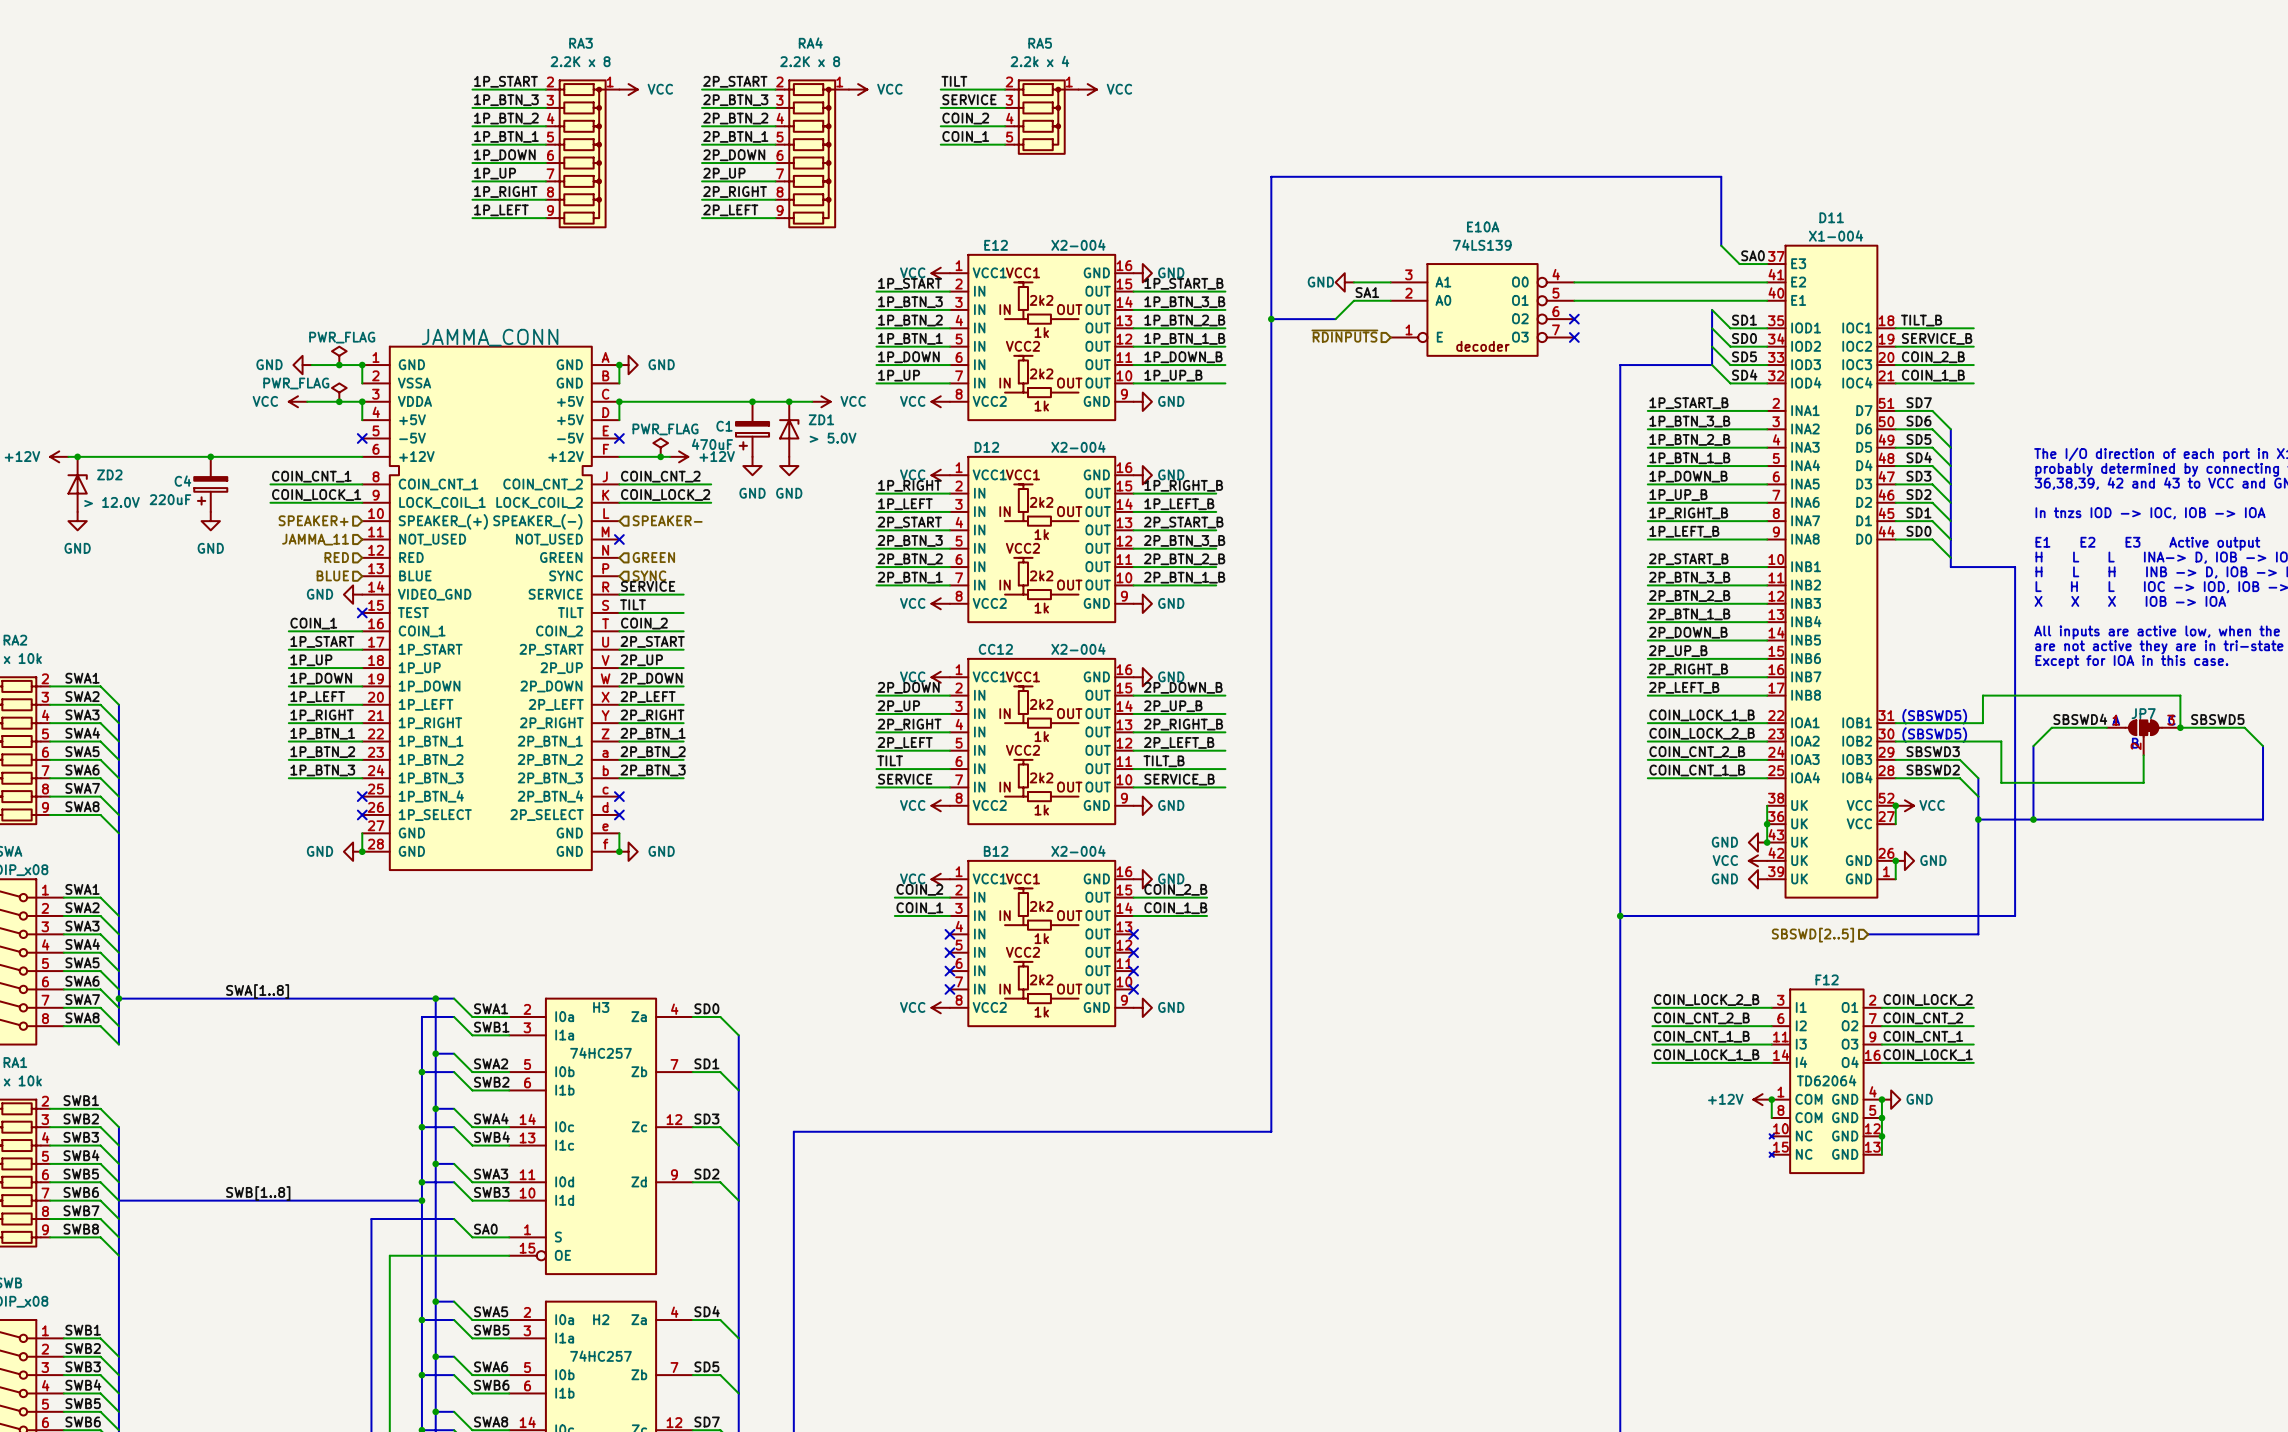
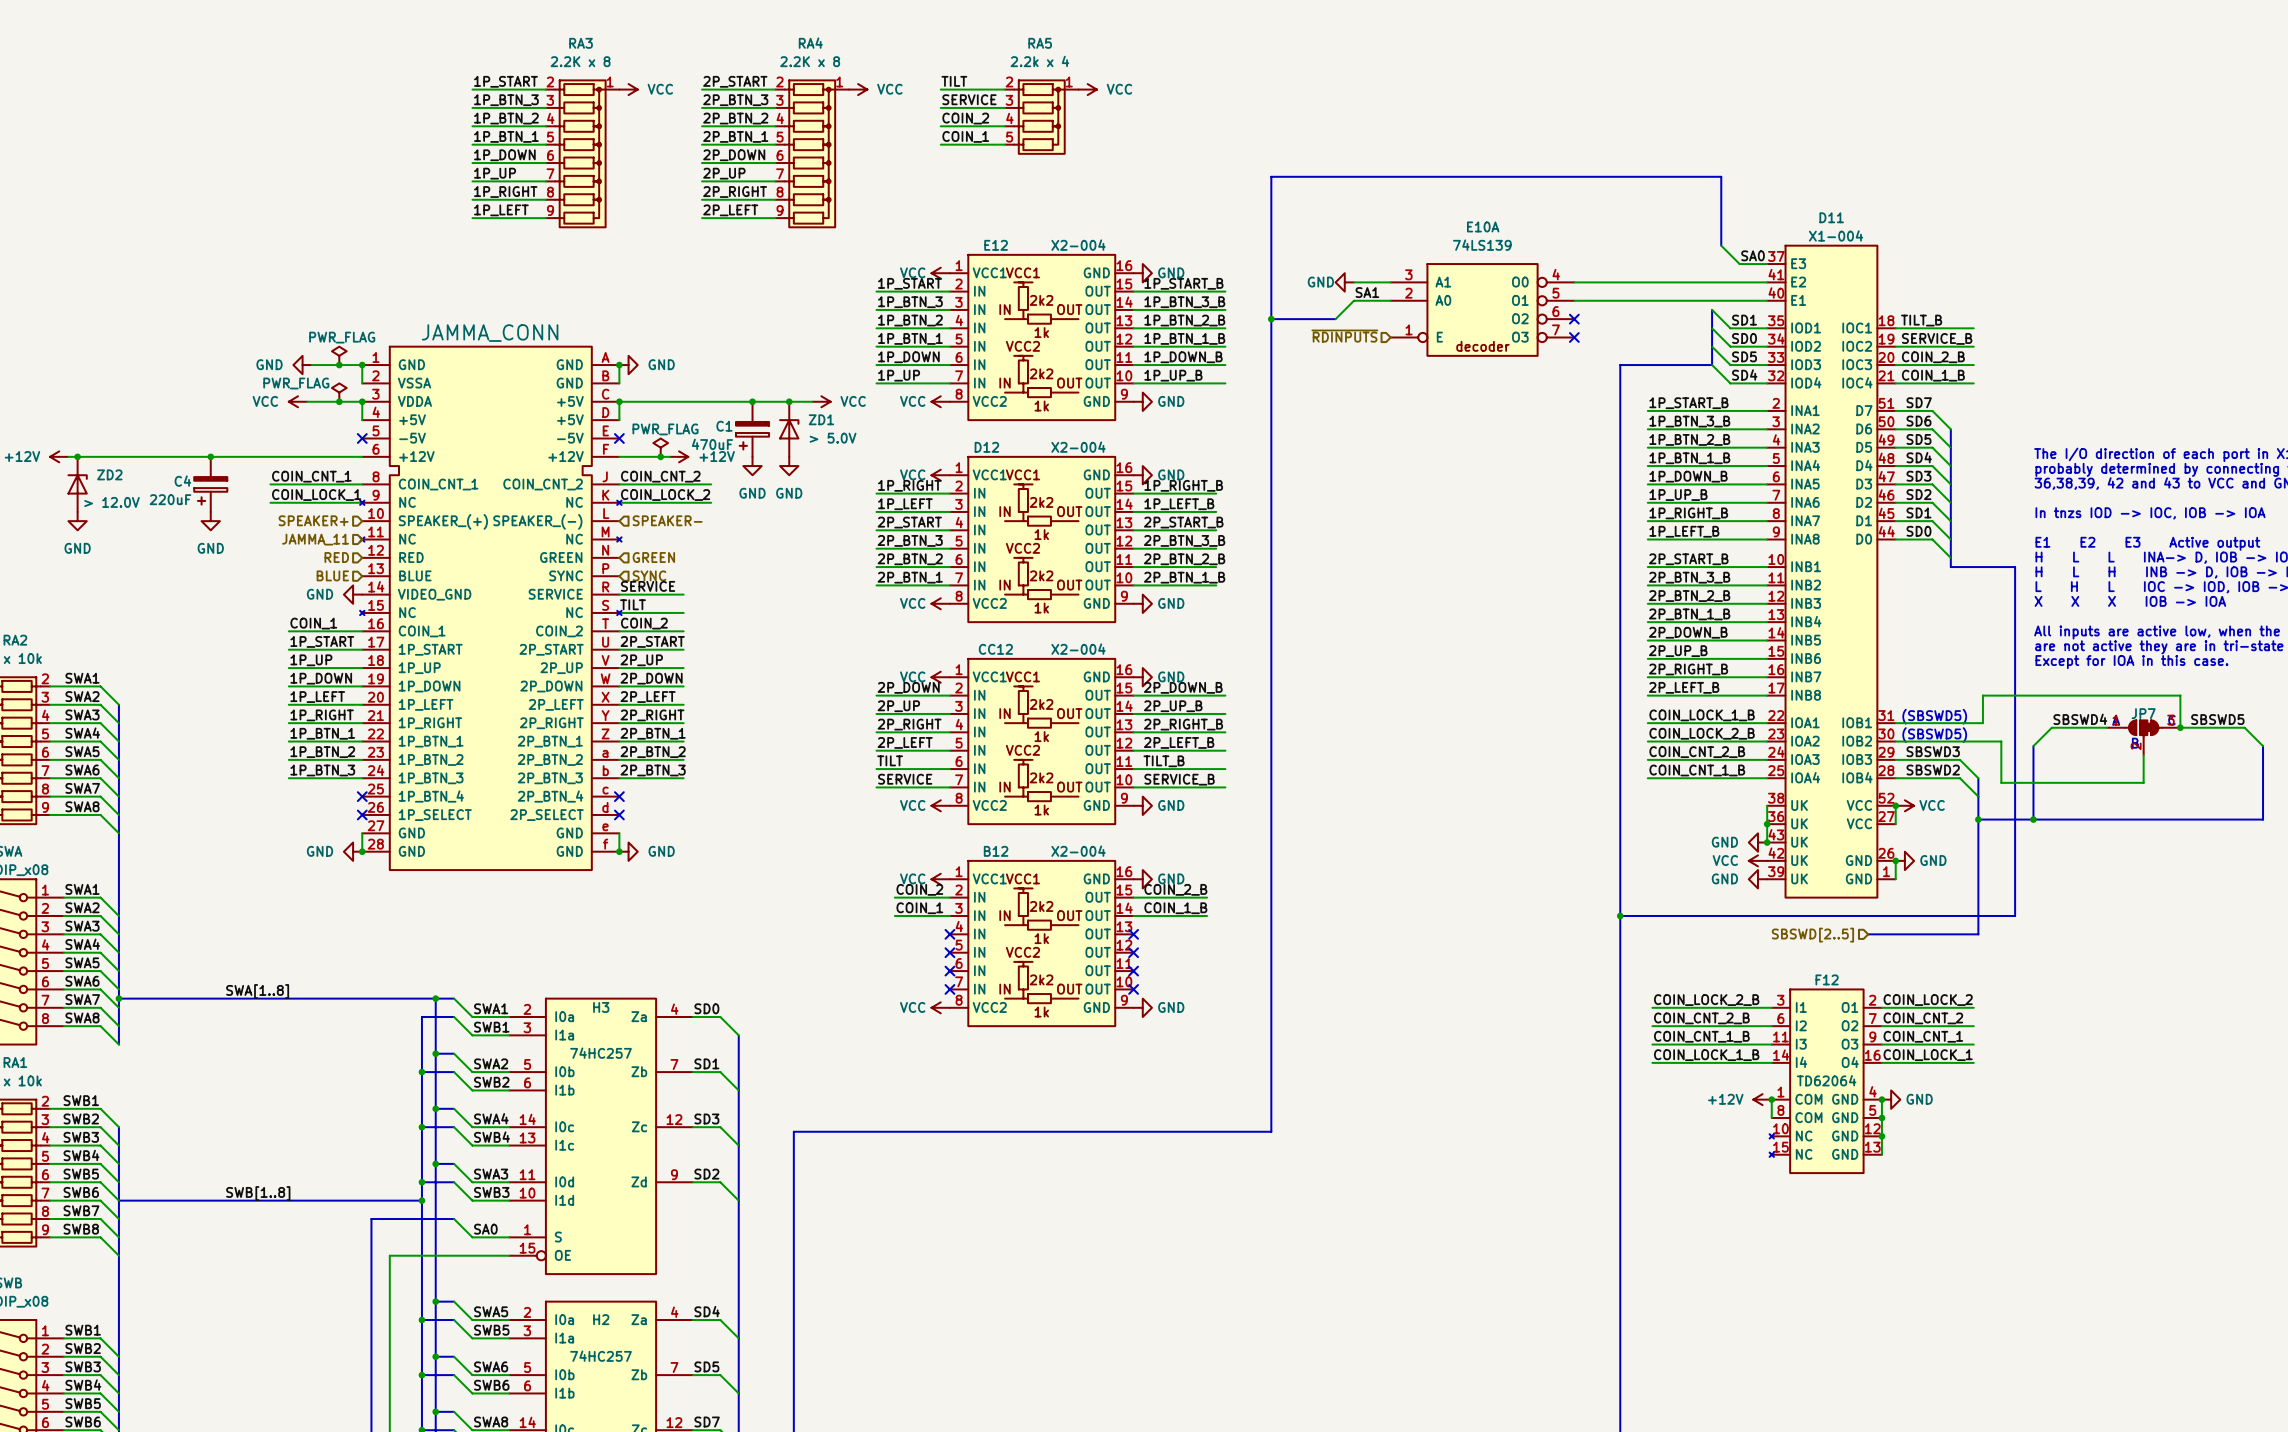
part symbol: [362, 346, 620, 871] -> [360, 346, 622, 871]
no-connect mark: (619, 539) -> none
no-connect mark: (362, 612) -> none

